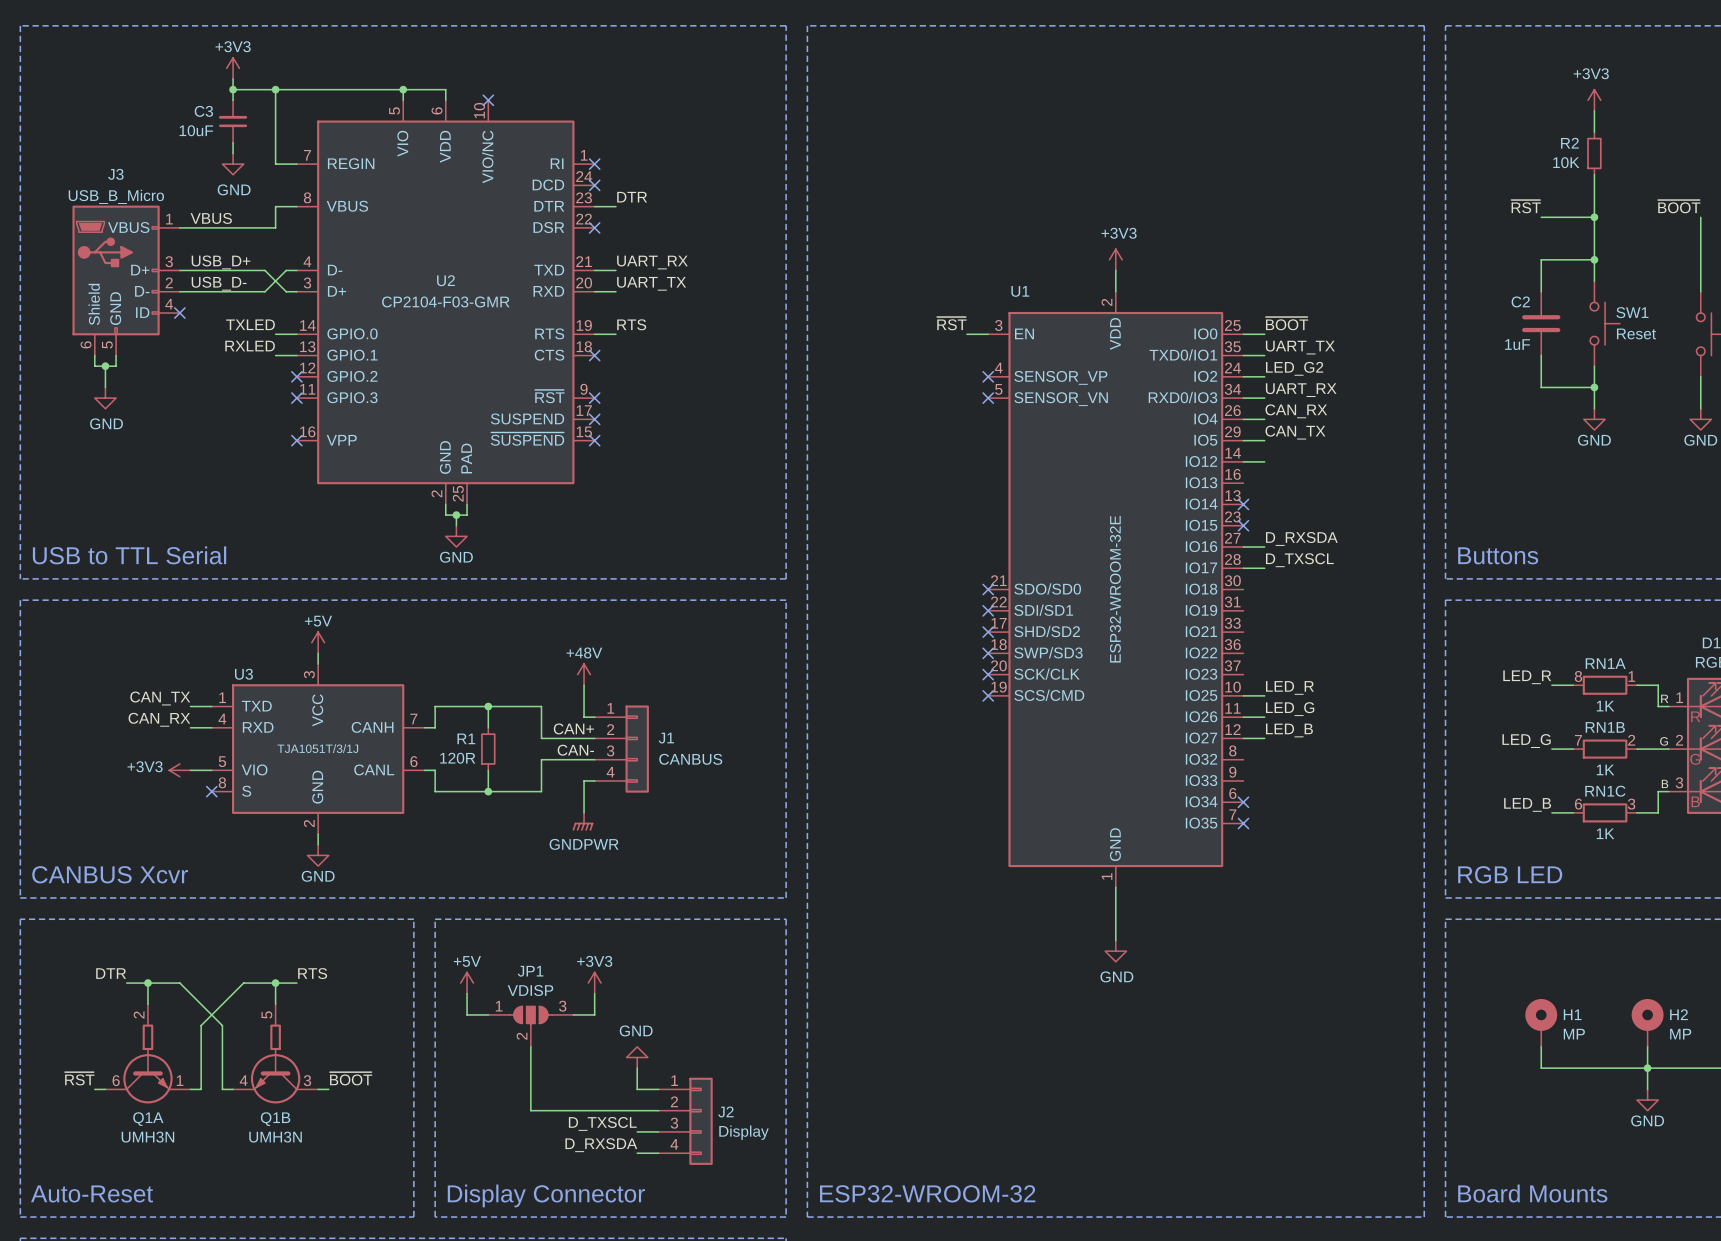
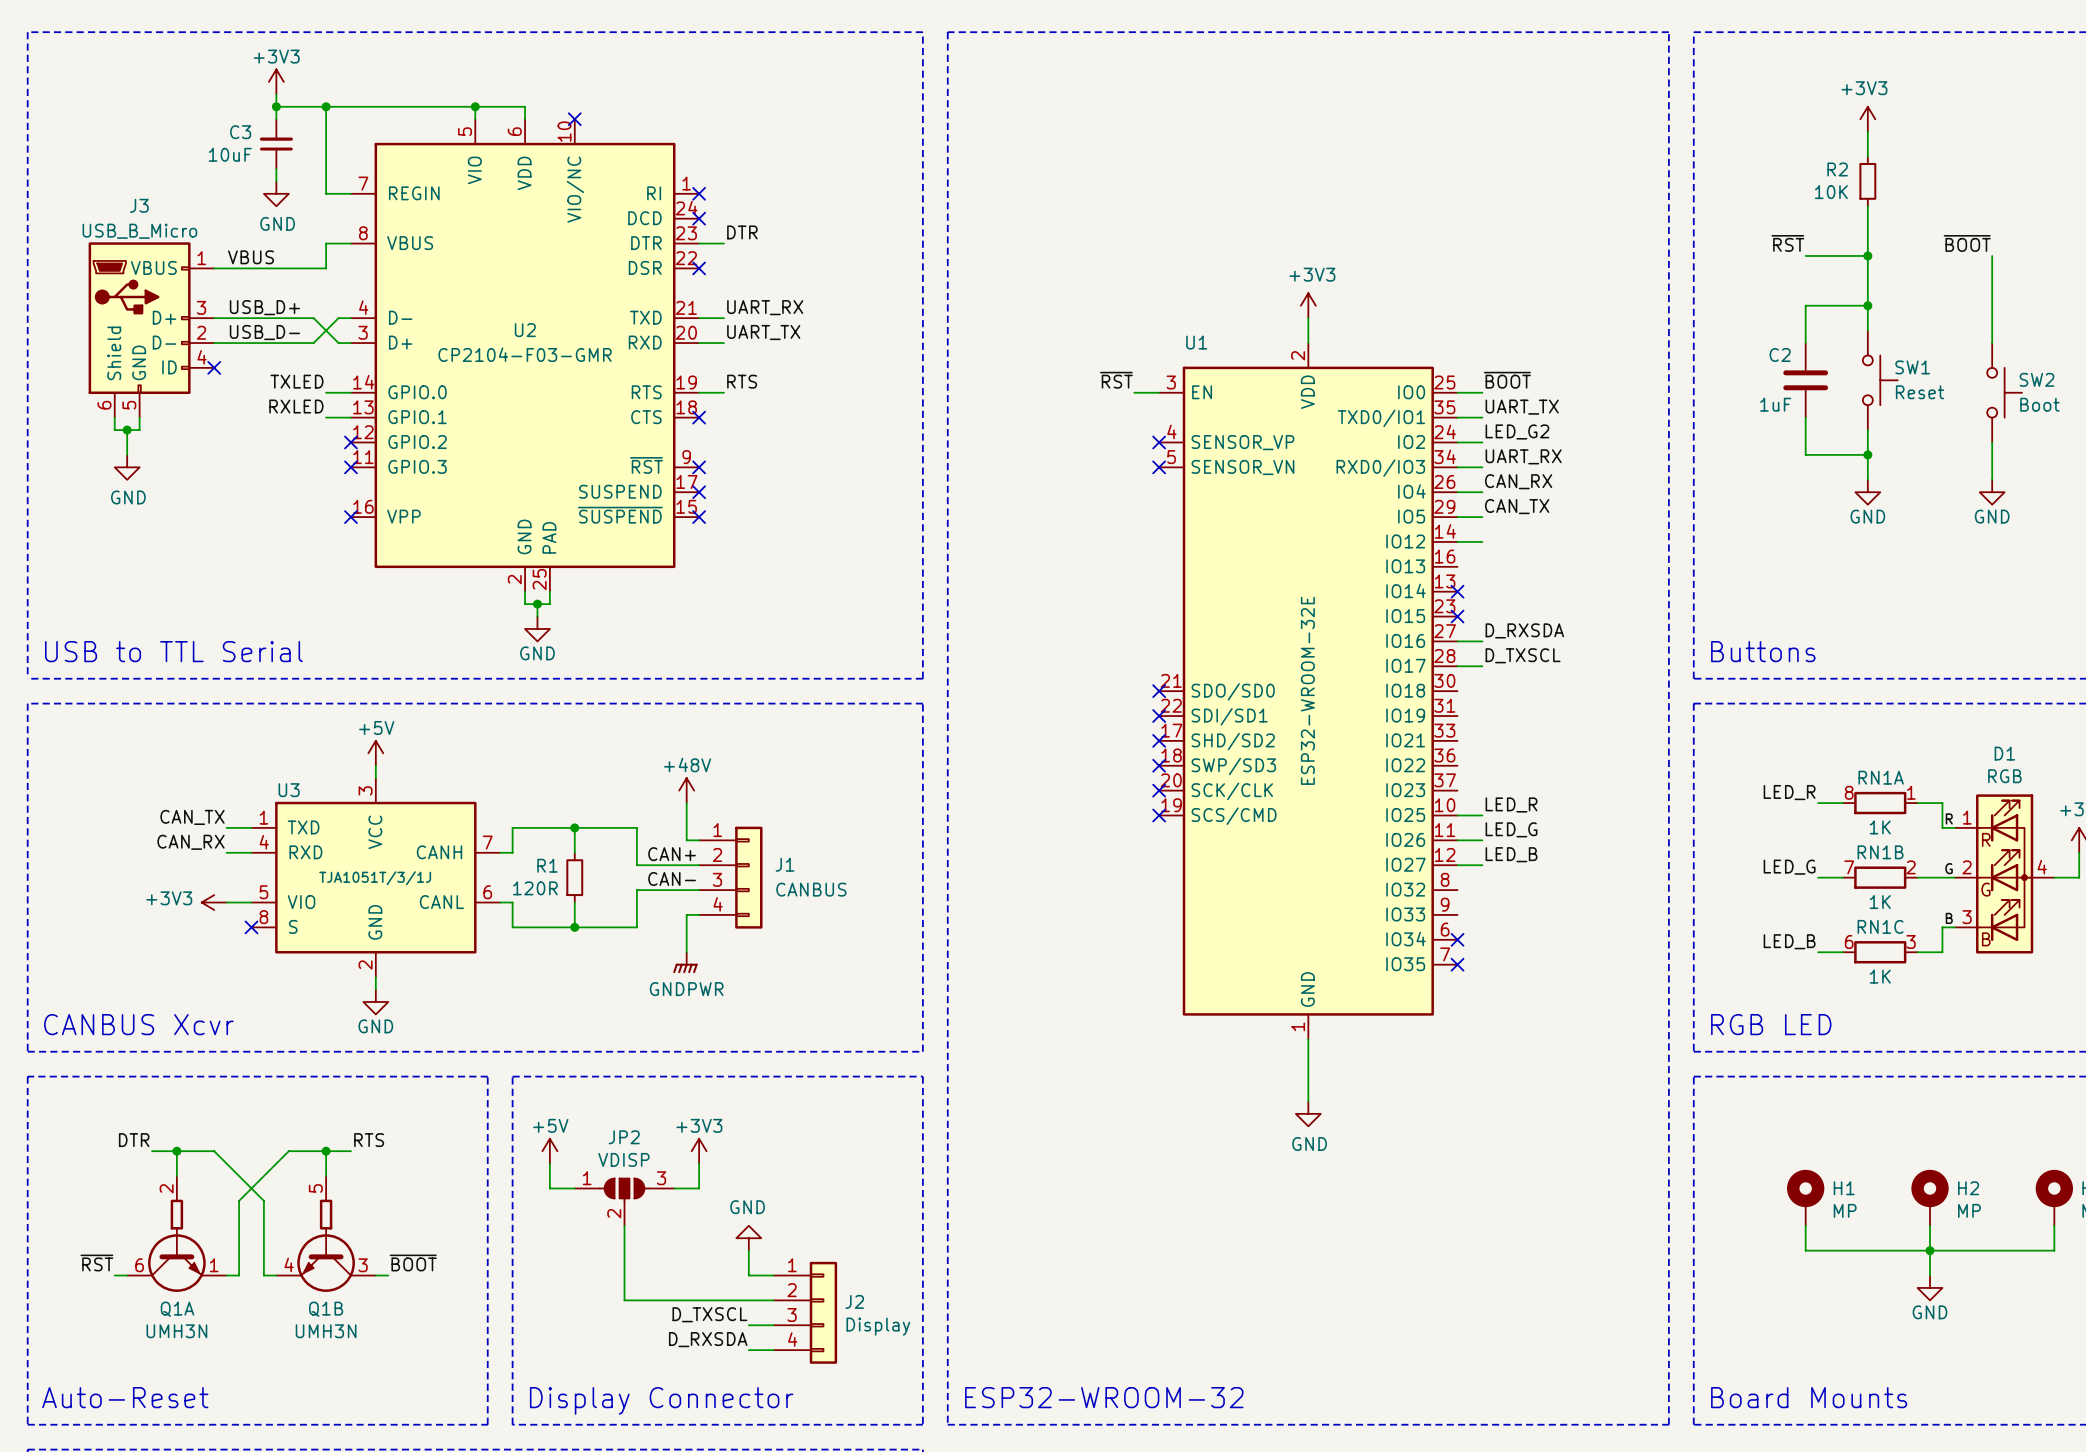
JP1 name: JP1 (530, 971) -> JP2 (624, 1137)

